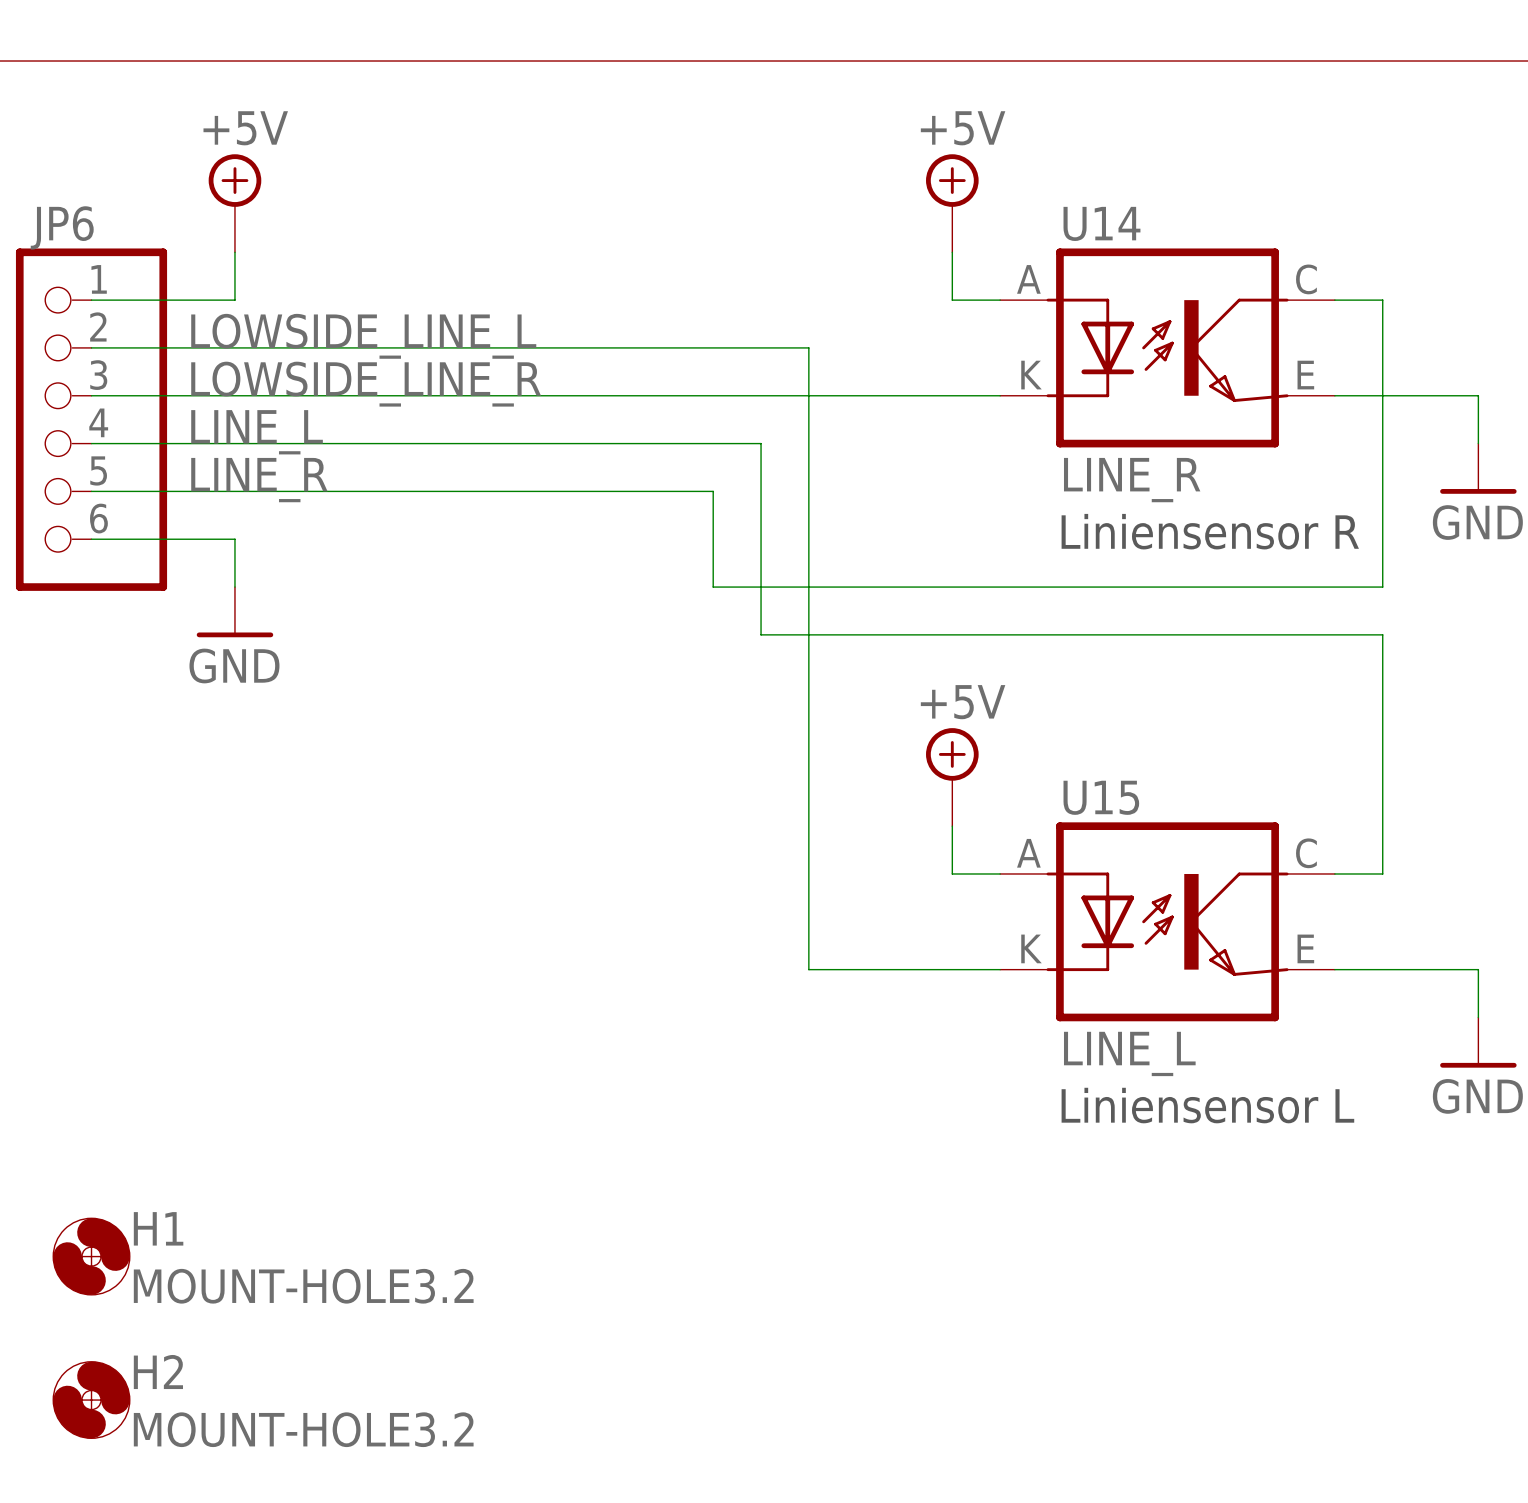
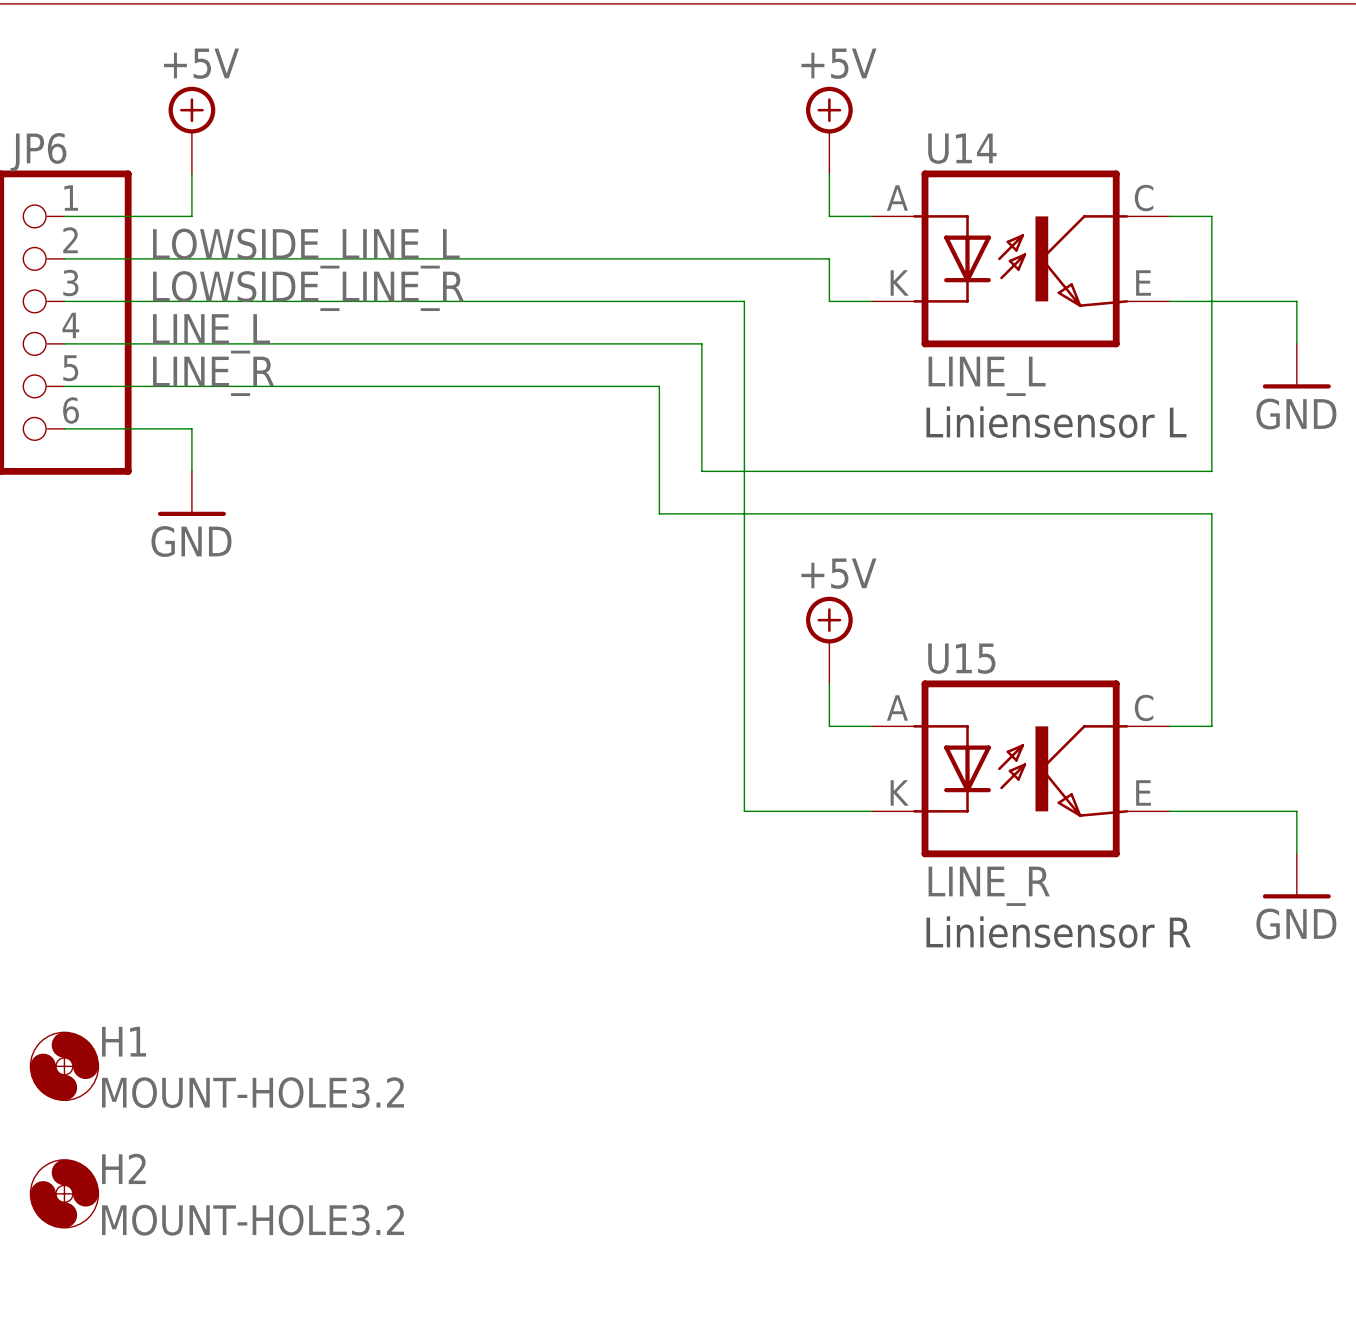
wire: (808, 347) (808, 443) -> (659, 343) (701, 343)
wire: (856, 395) (952, 395) -> (701, 258) (829, 258) (829, 301)
wire: (761, 443) (761, 491) -> (616, 386) (659, 386)
U14 value: LINE_R (1132, 480) -> LINE_L (987, 376)
wire: (713, 491) (713, 587) (808, 587) (808, 969) (856, 969) -> (744, 301) (744, 811)
text: Liniensensor R (1210, 531) -> Liniensensor L (1056, 422)
U15 value: LINE_L (1129, 1053) -> LINE_R (989, 886)
text: Liniensensor L (1207, 1105) -> Liniensensor R (1058, 932)

